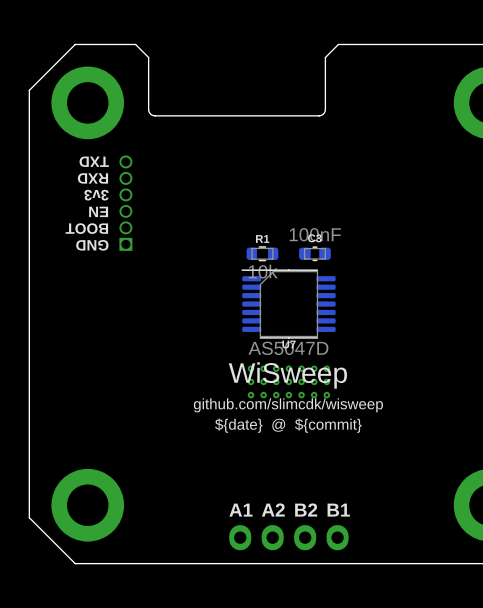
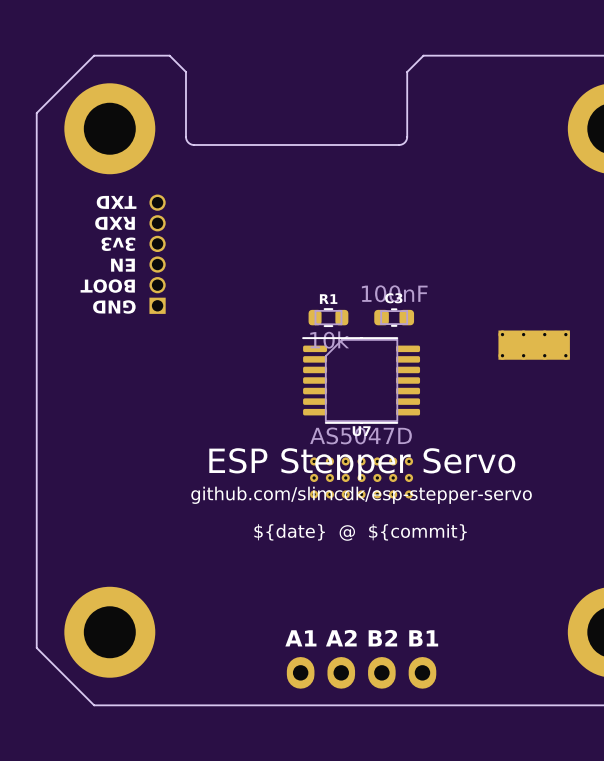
part: none -> (534, 345)
text: WiSweep (287, 375) -> ESP Stepper Servo (362, 464)
text: github.com/slimcdk/wisweep (288, 405) -> github.com/slimcdk/esp-stepper-servo (361, 495)

